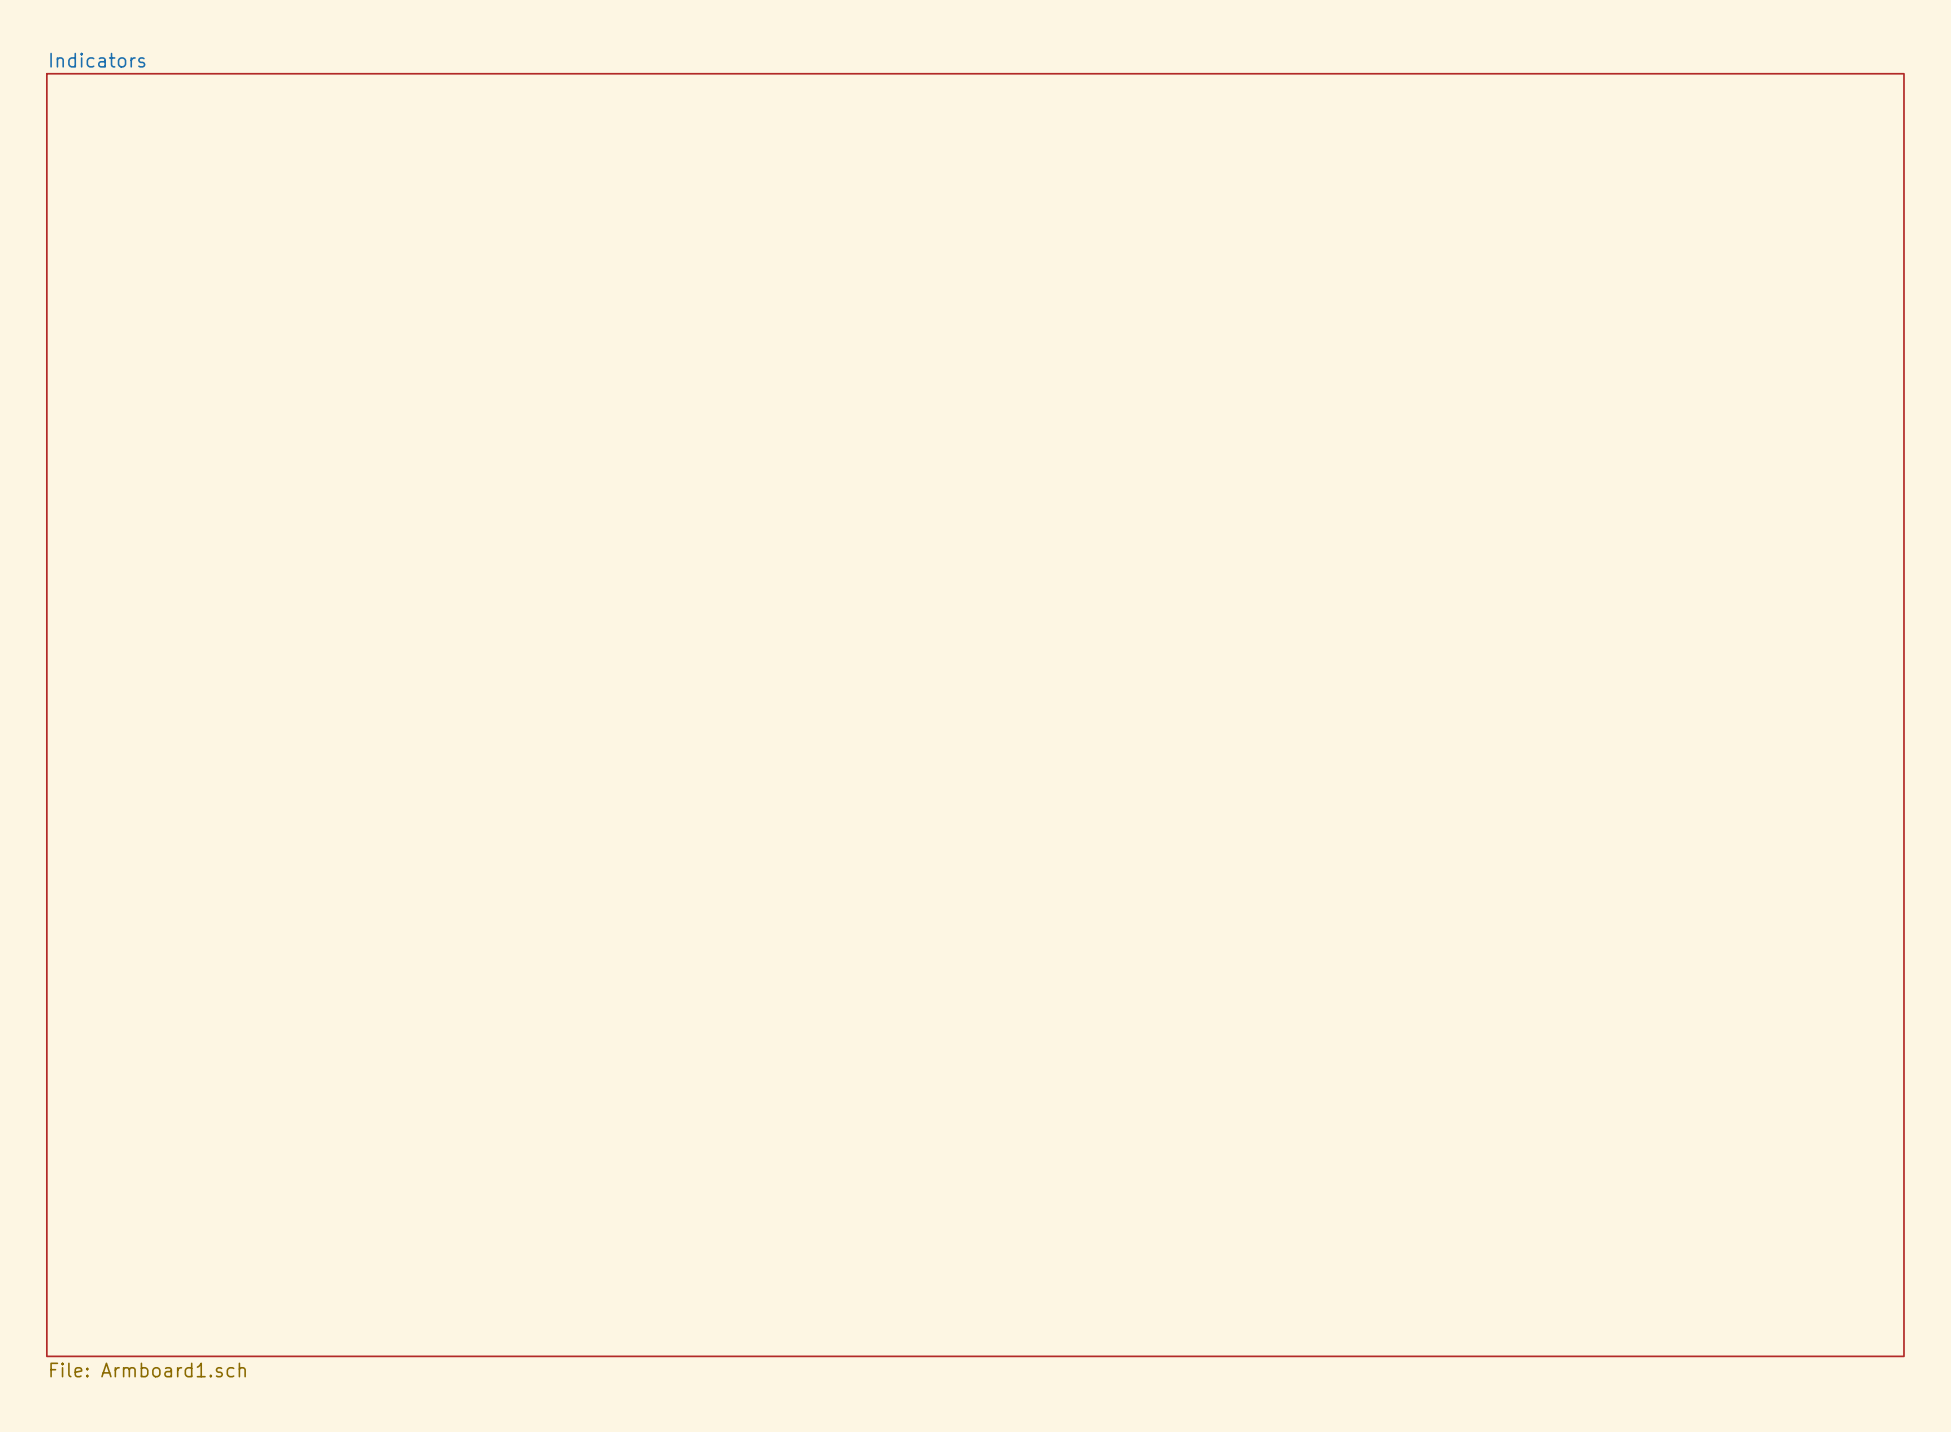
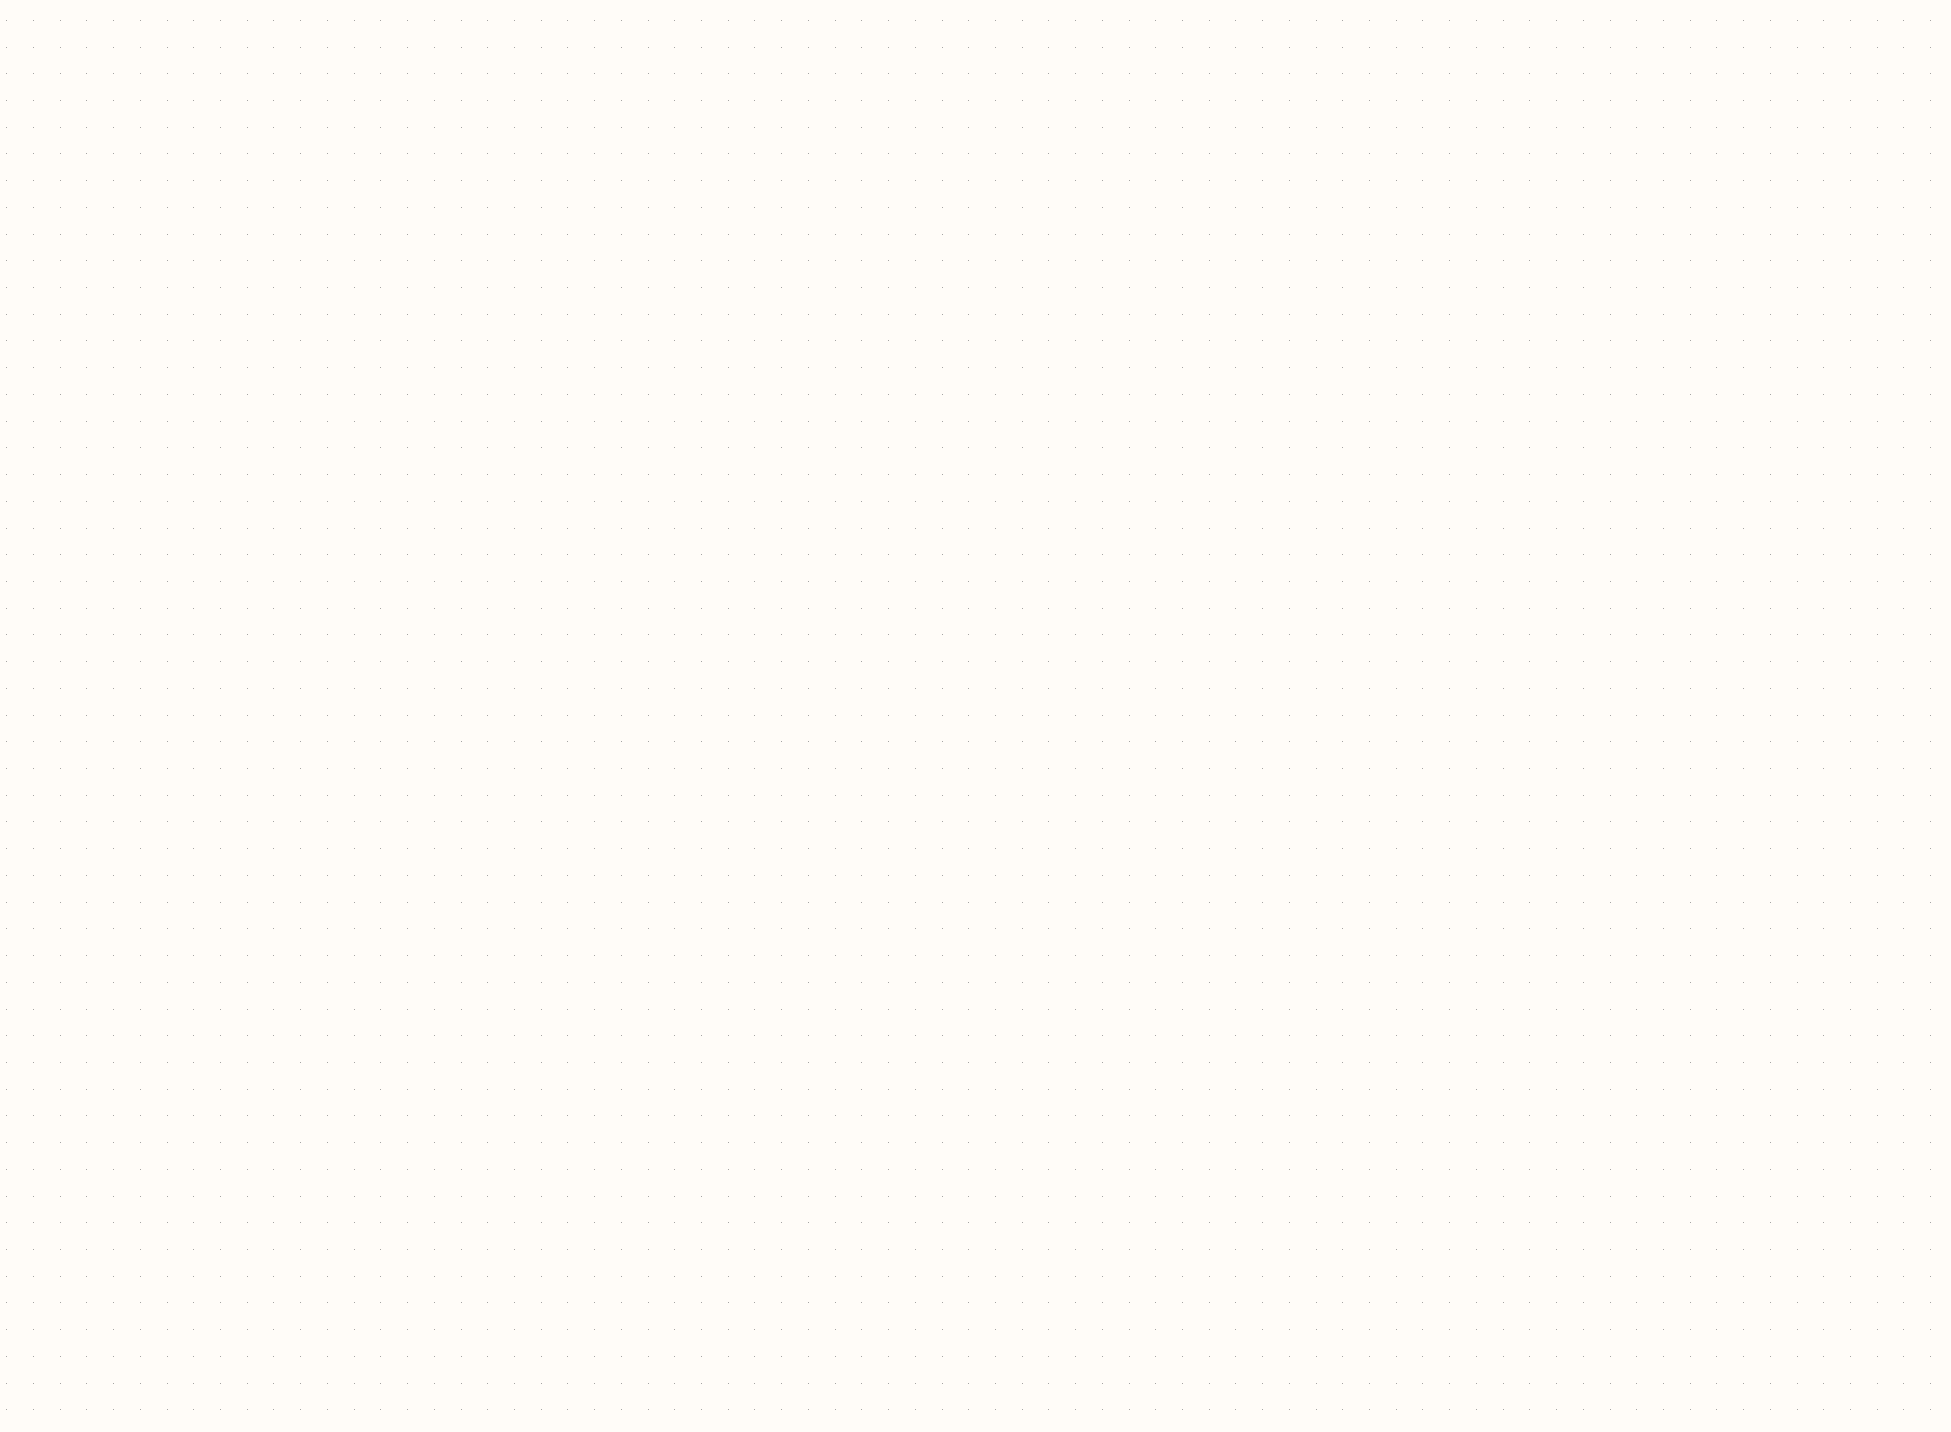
sheet Indicators: File: Armboard1.sch (975, 715) -> none

